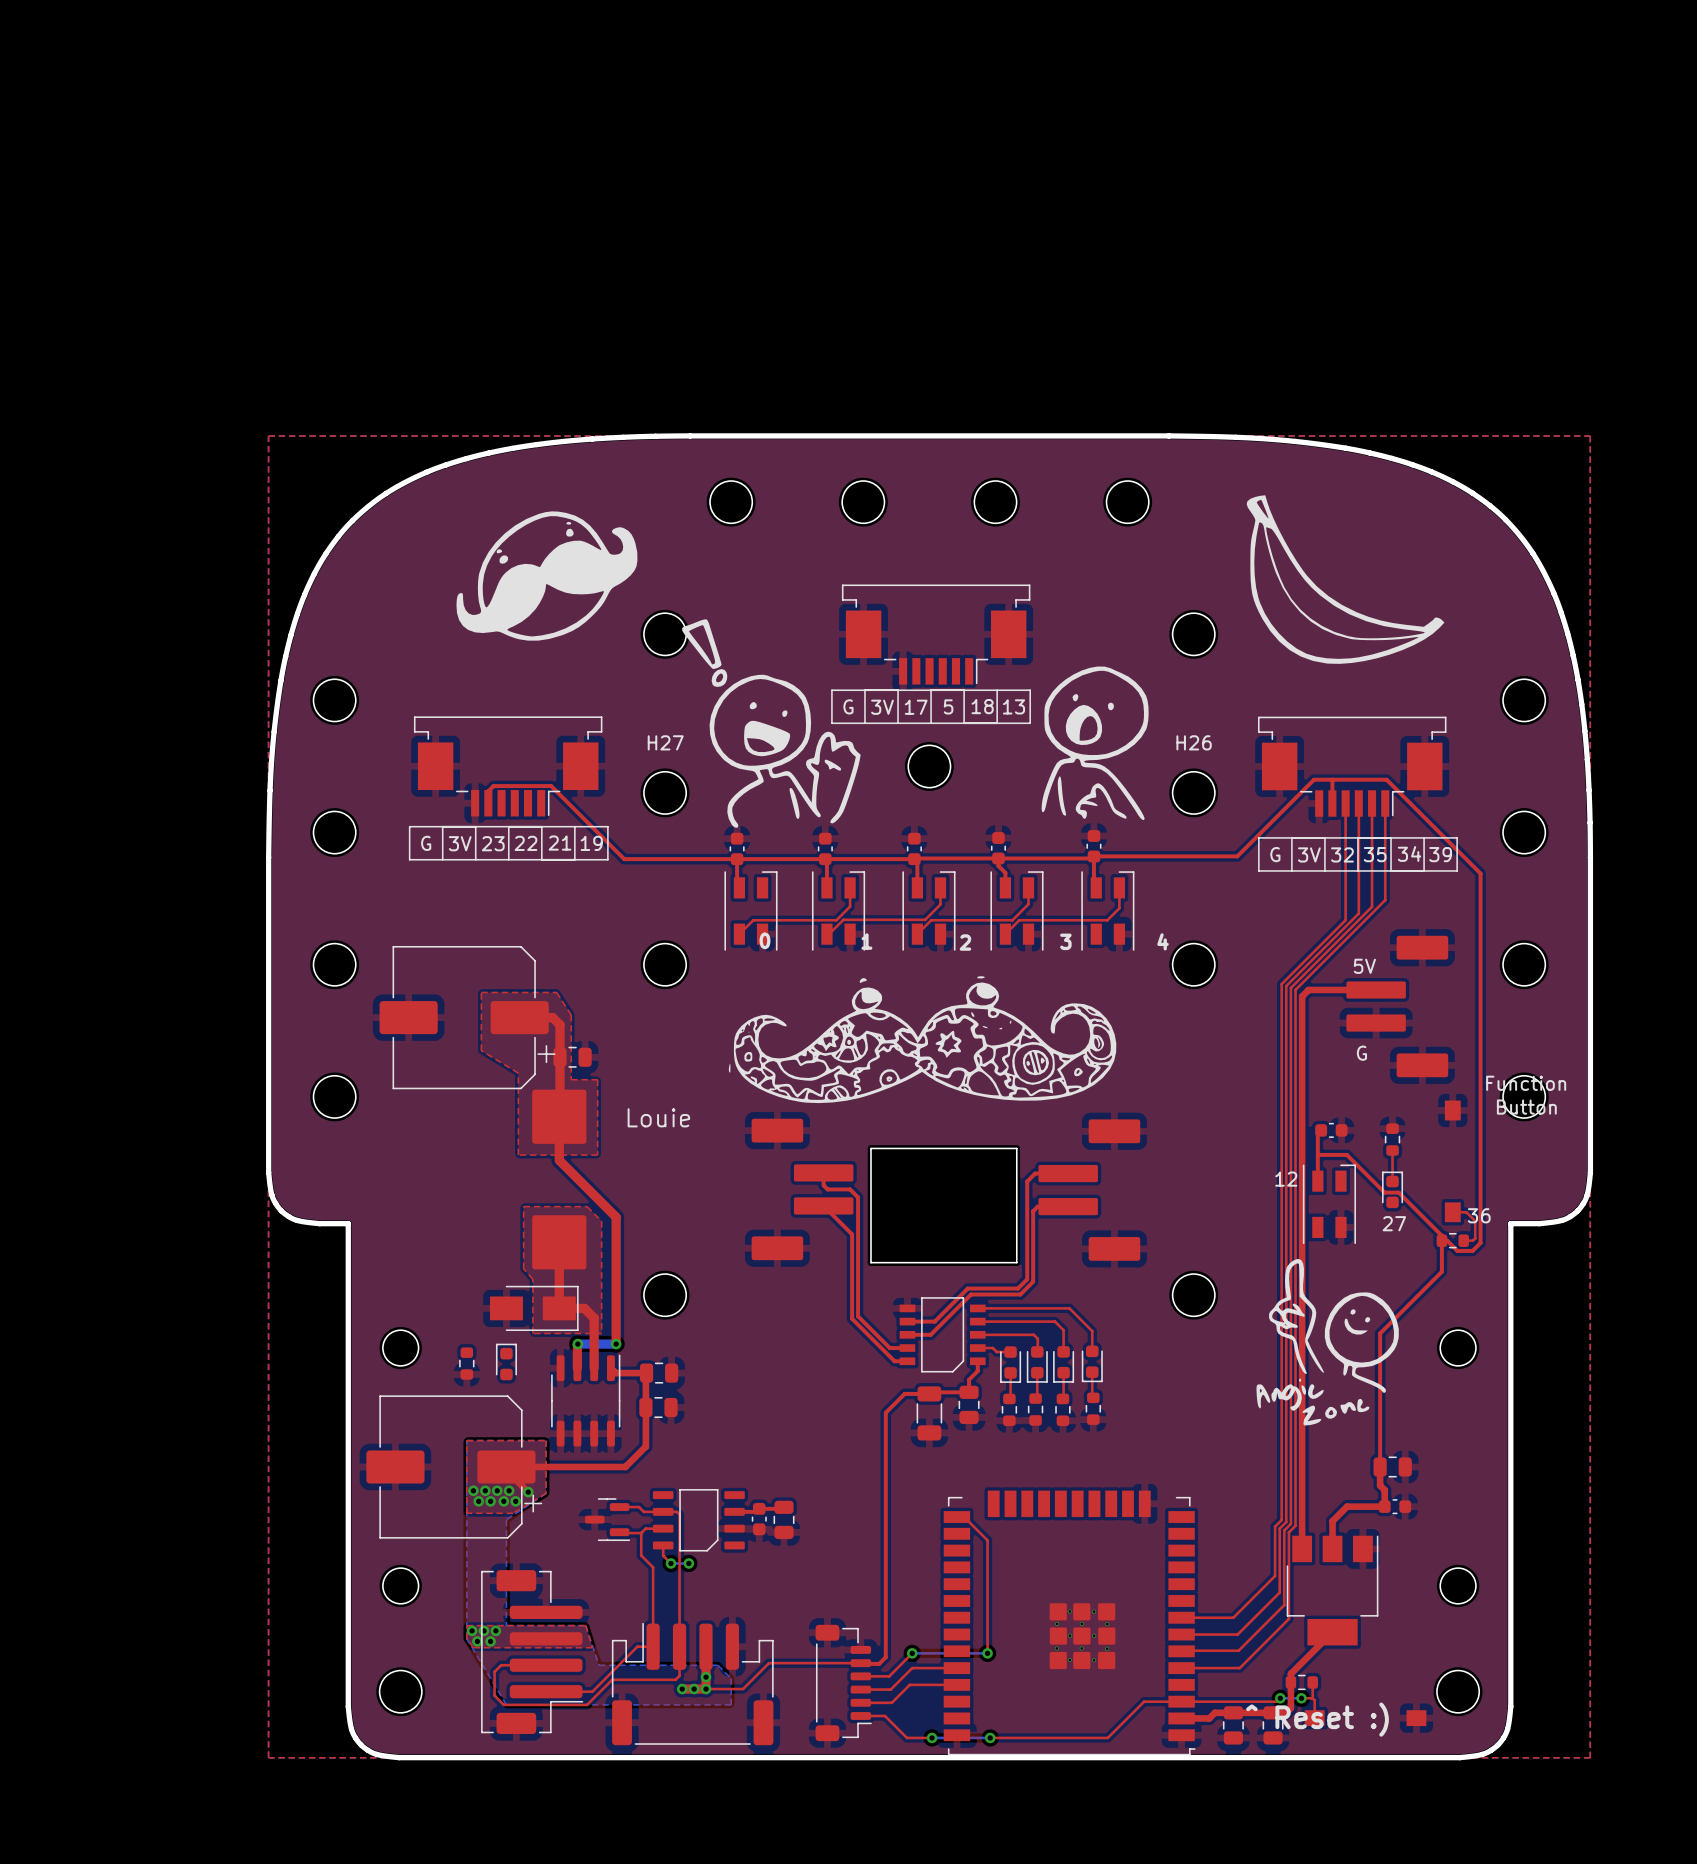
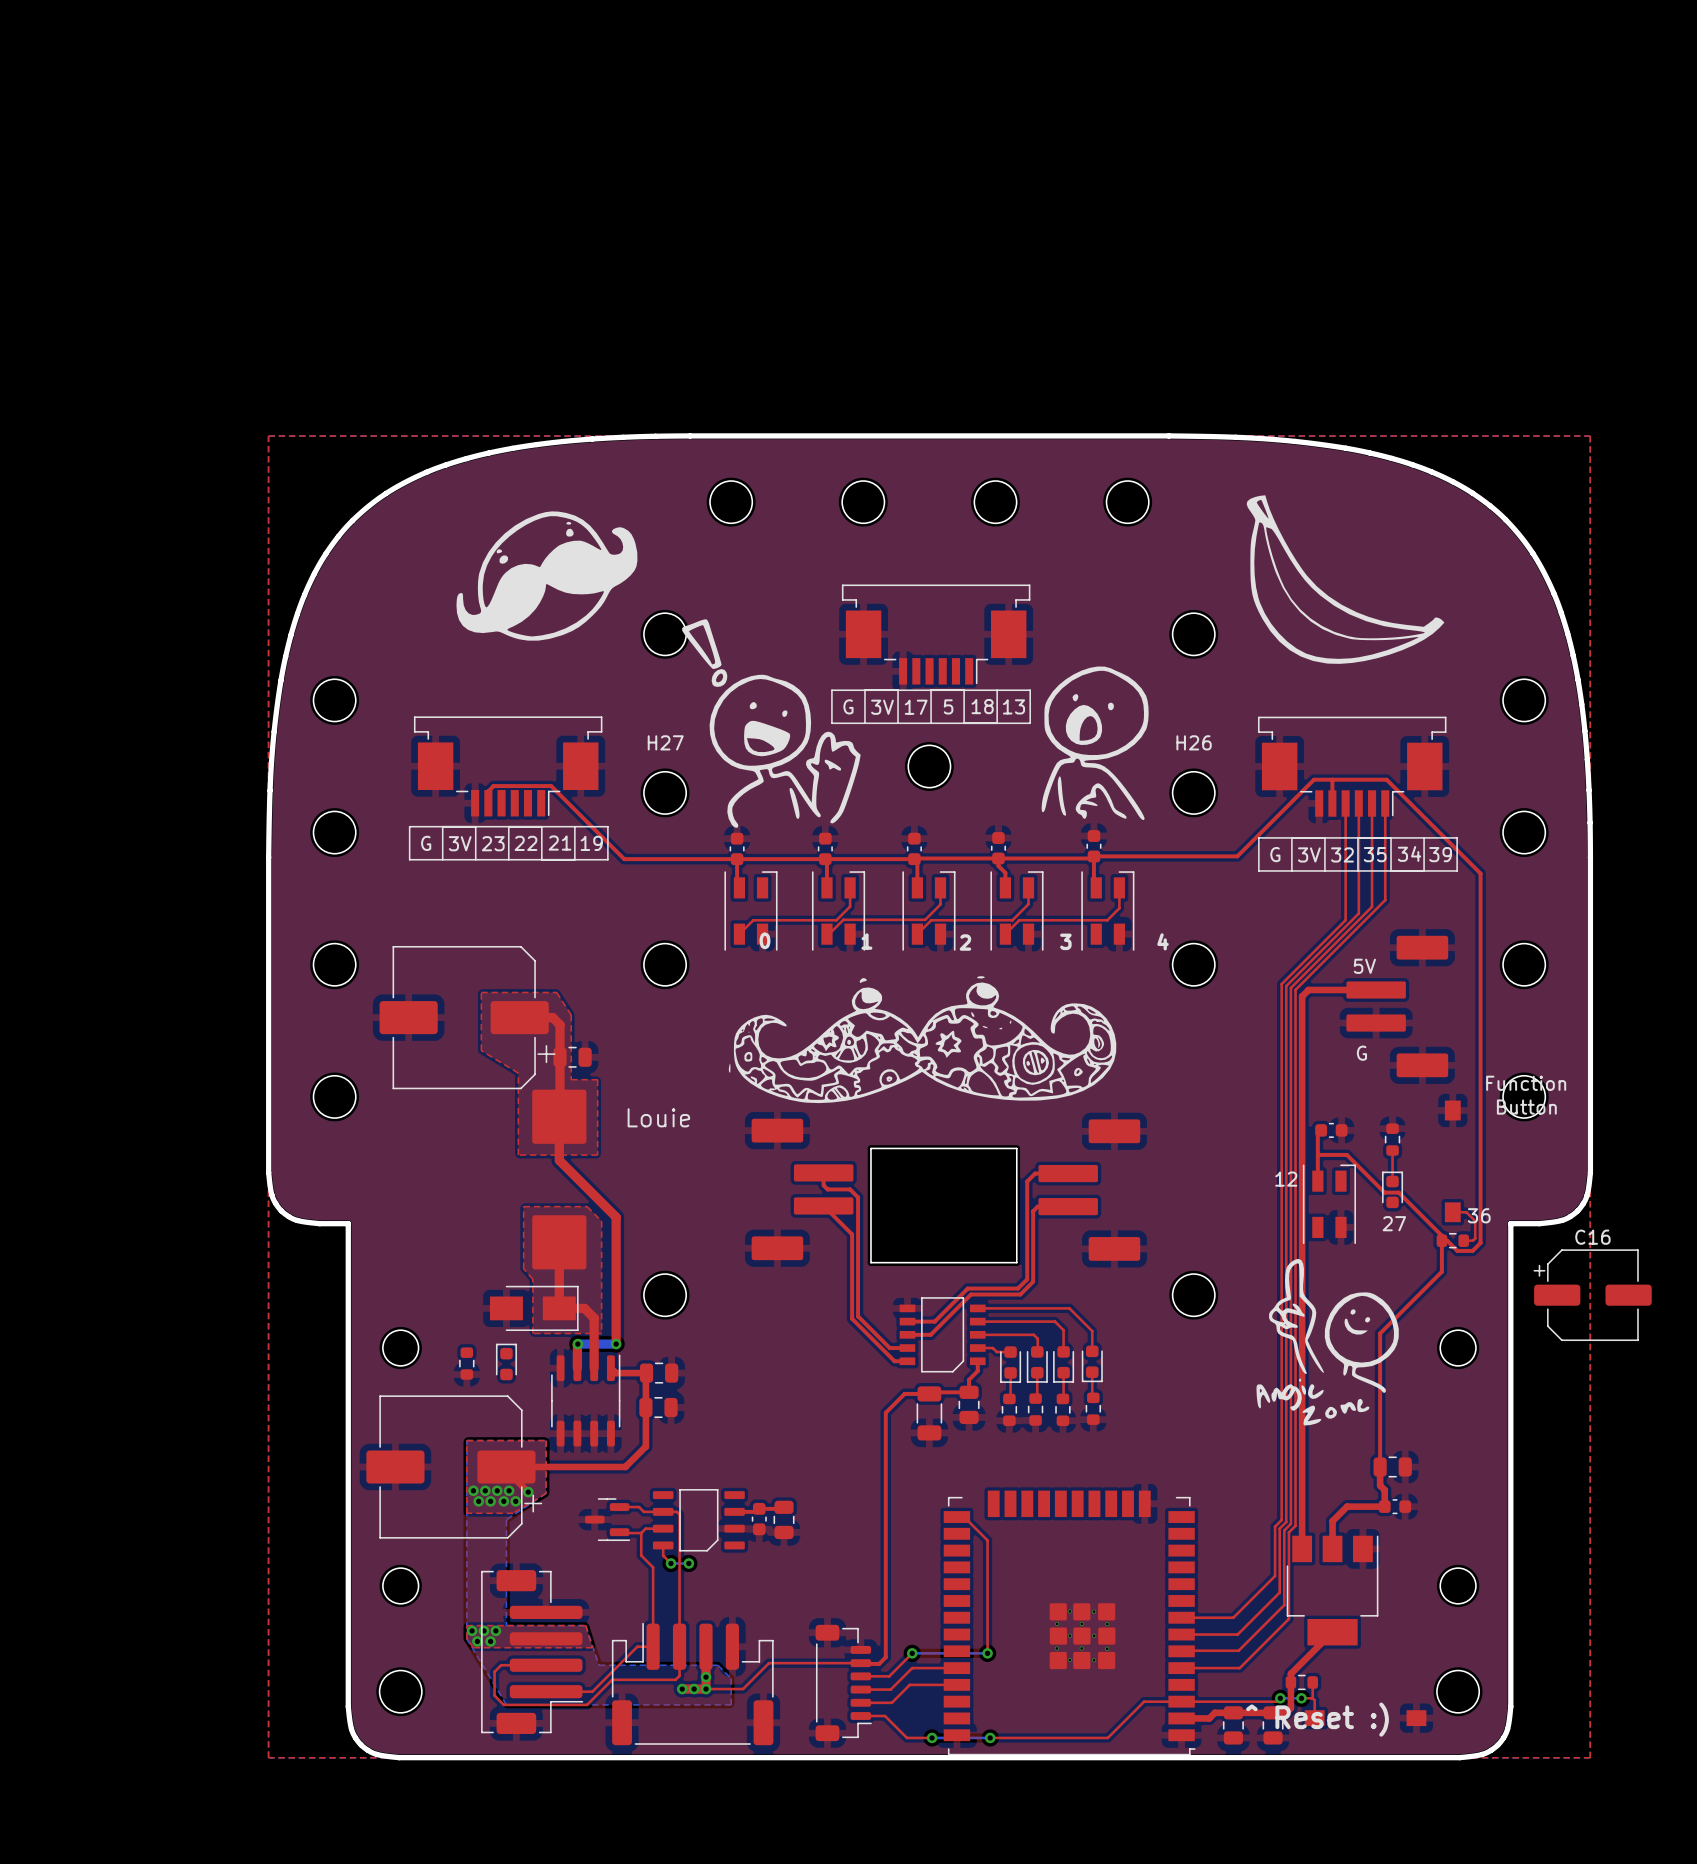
C16: none -> (1592, 1295)

